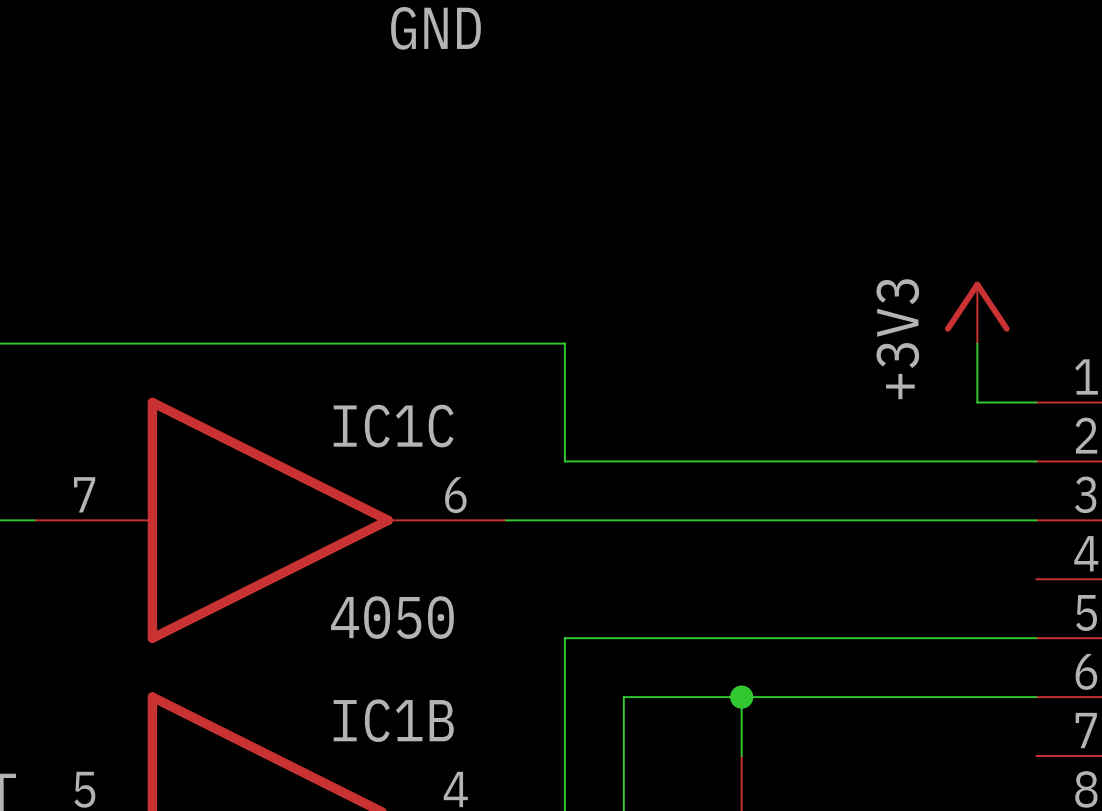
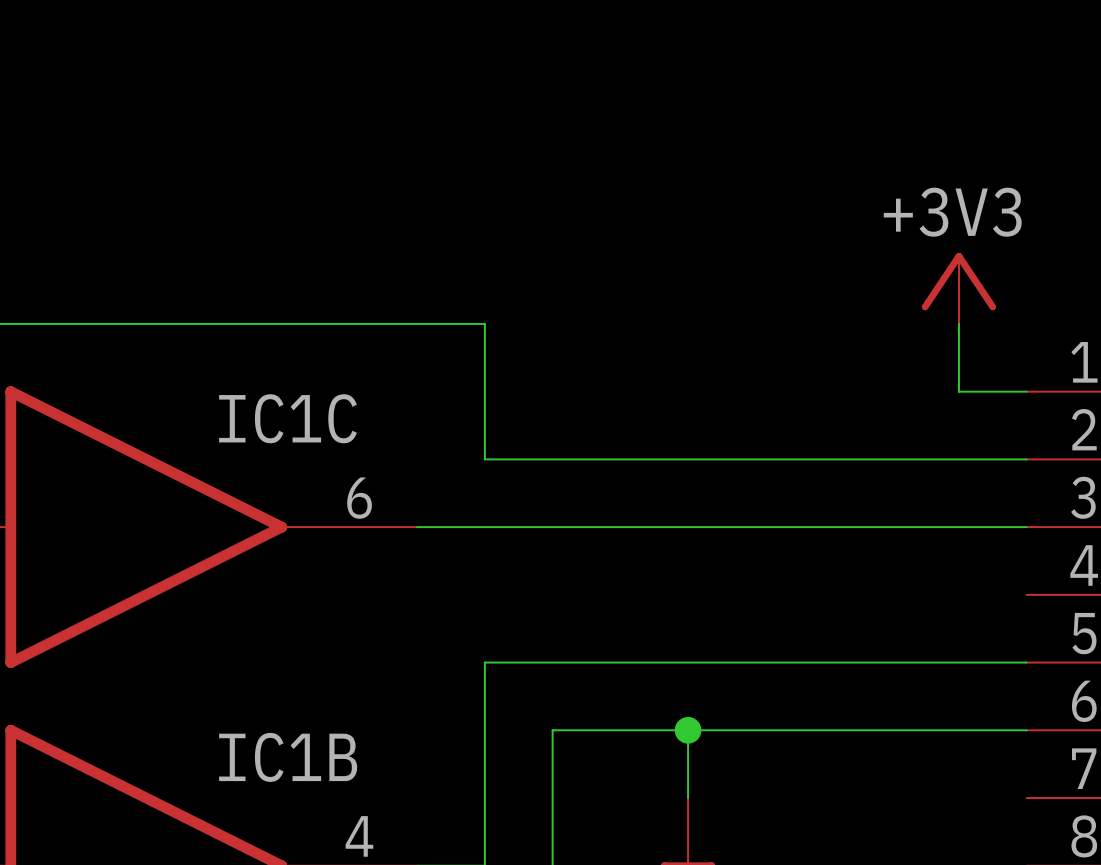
power symbol text rotation: 0° (897, 339) -> 90° clockwise (952, 212)
IC1C value: 4050 (392, 617) -> none

